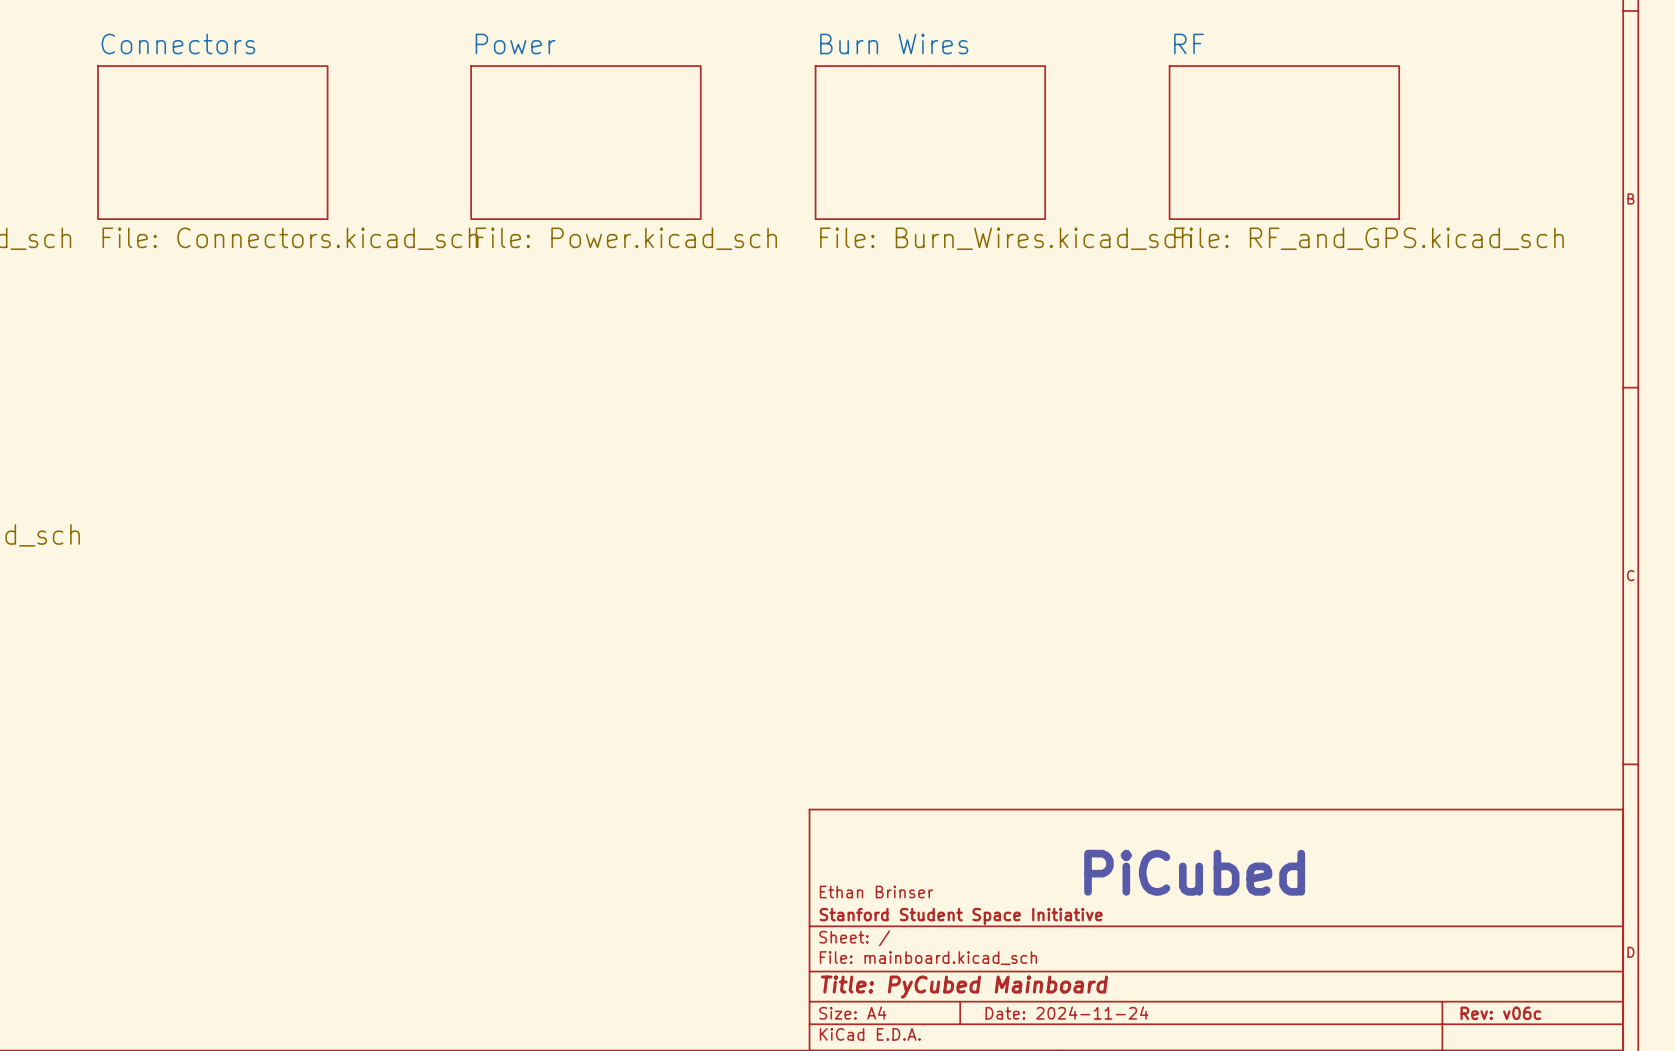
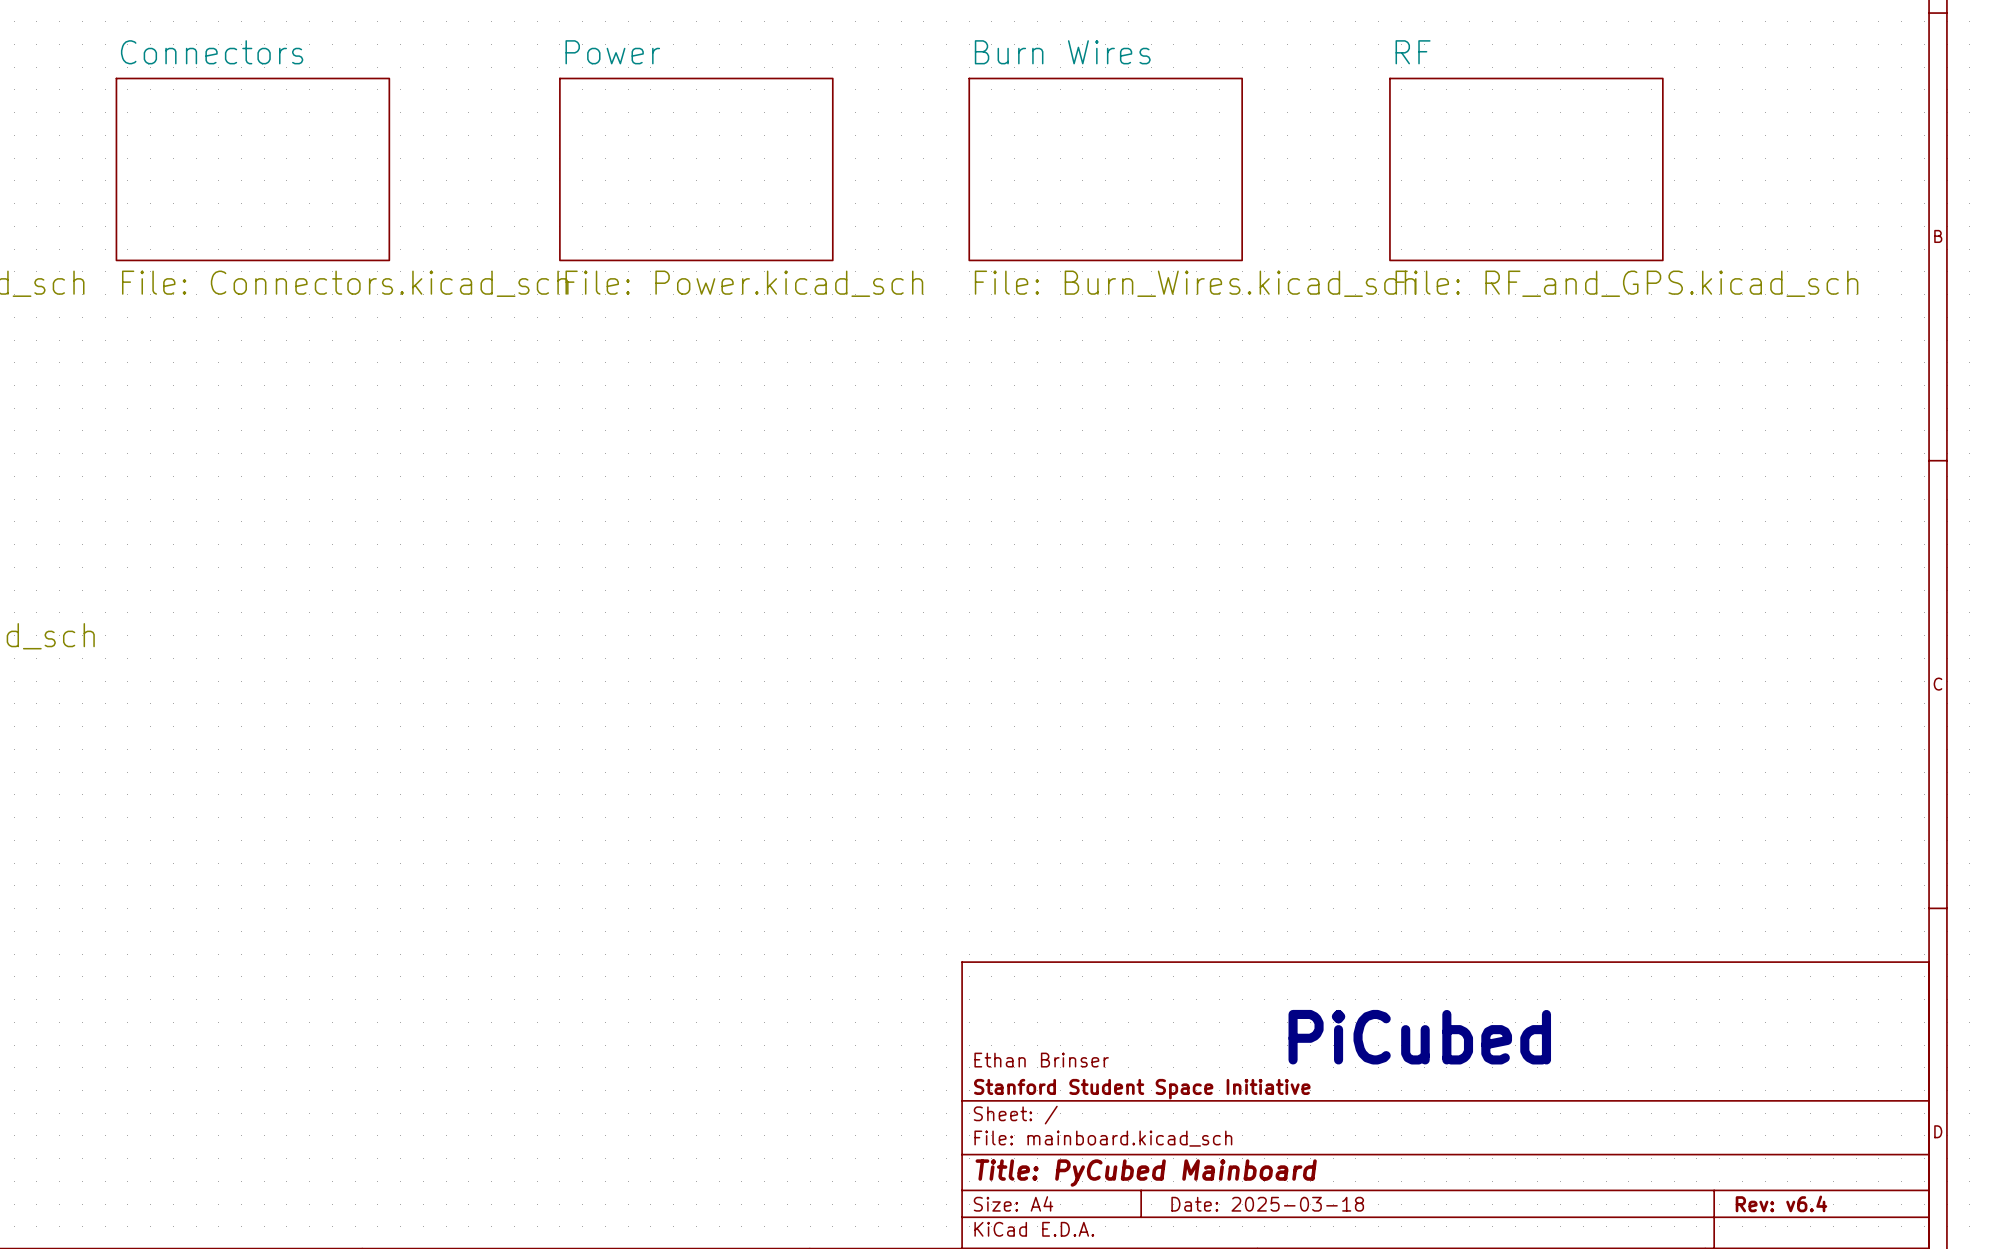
title block: Date: 2024-11-24 (1066, 1013) -> Date: 2025-03-18 (1267, 1204)
title block: Rev: v06c (1500, 1013) -> Rev: v6.4 (1781, 1203)

